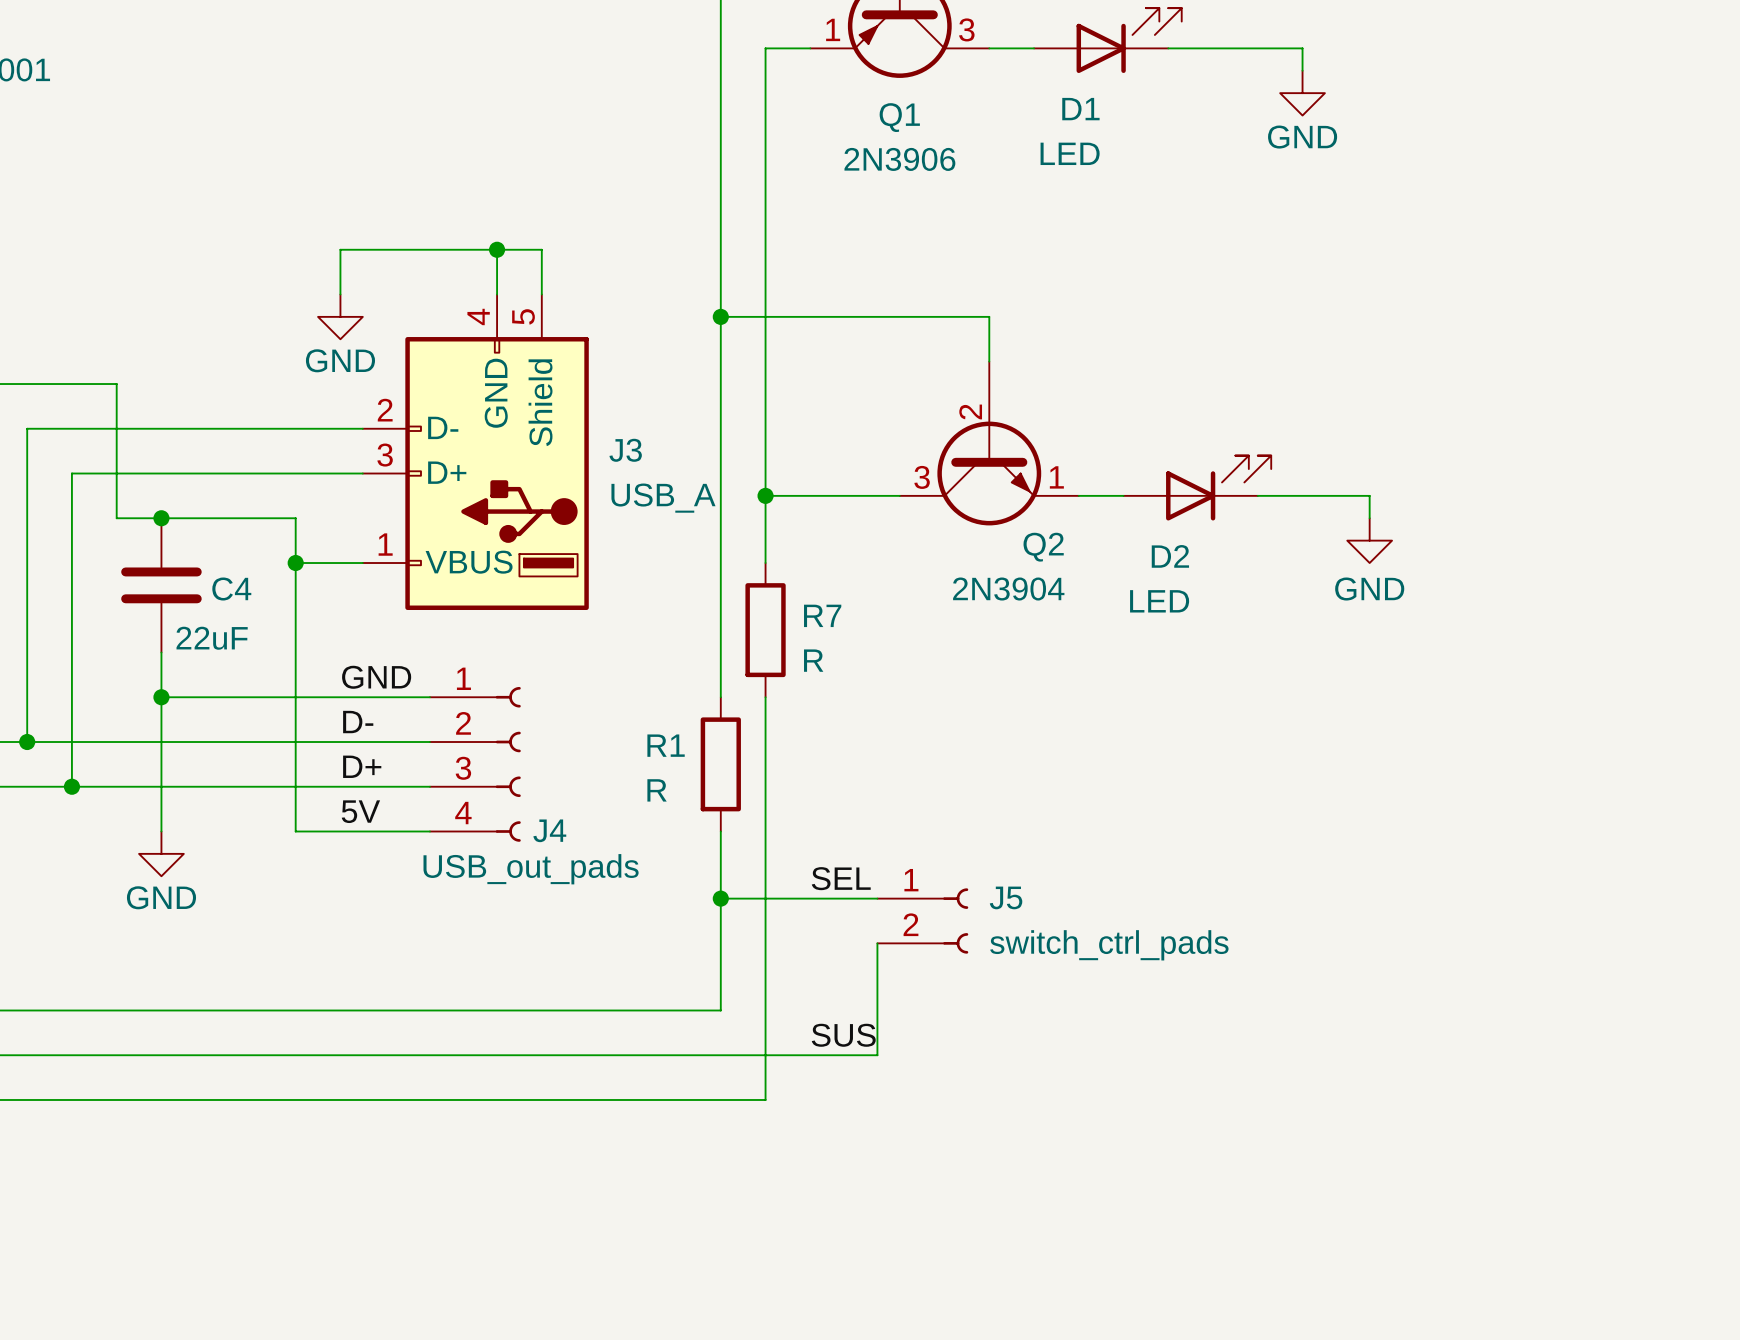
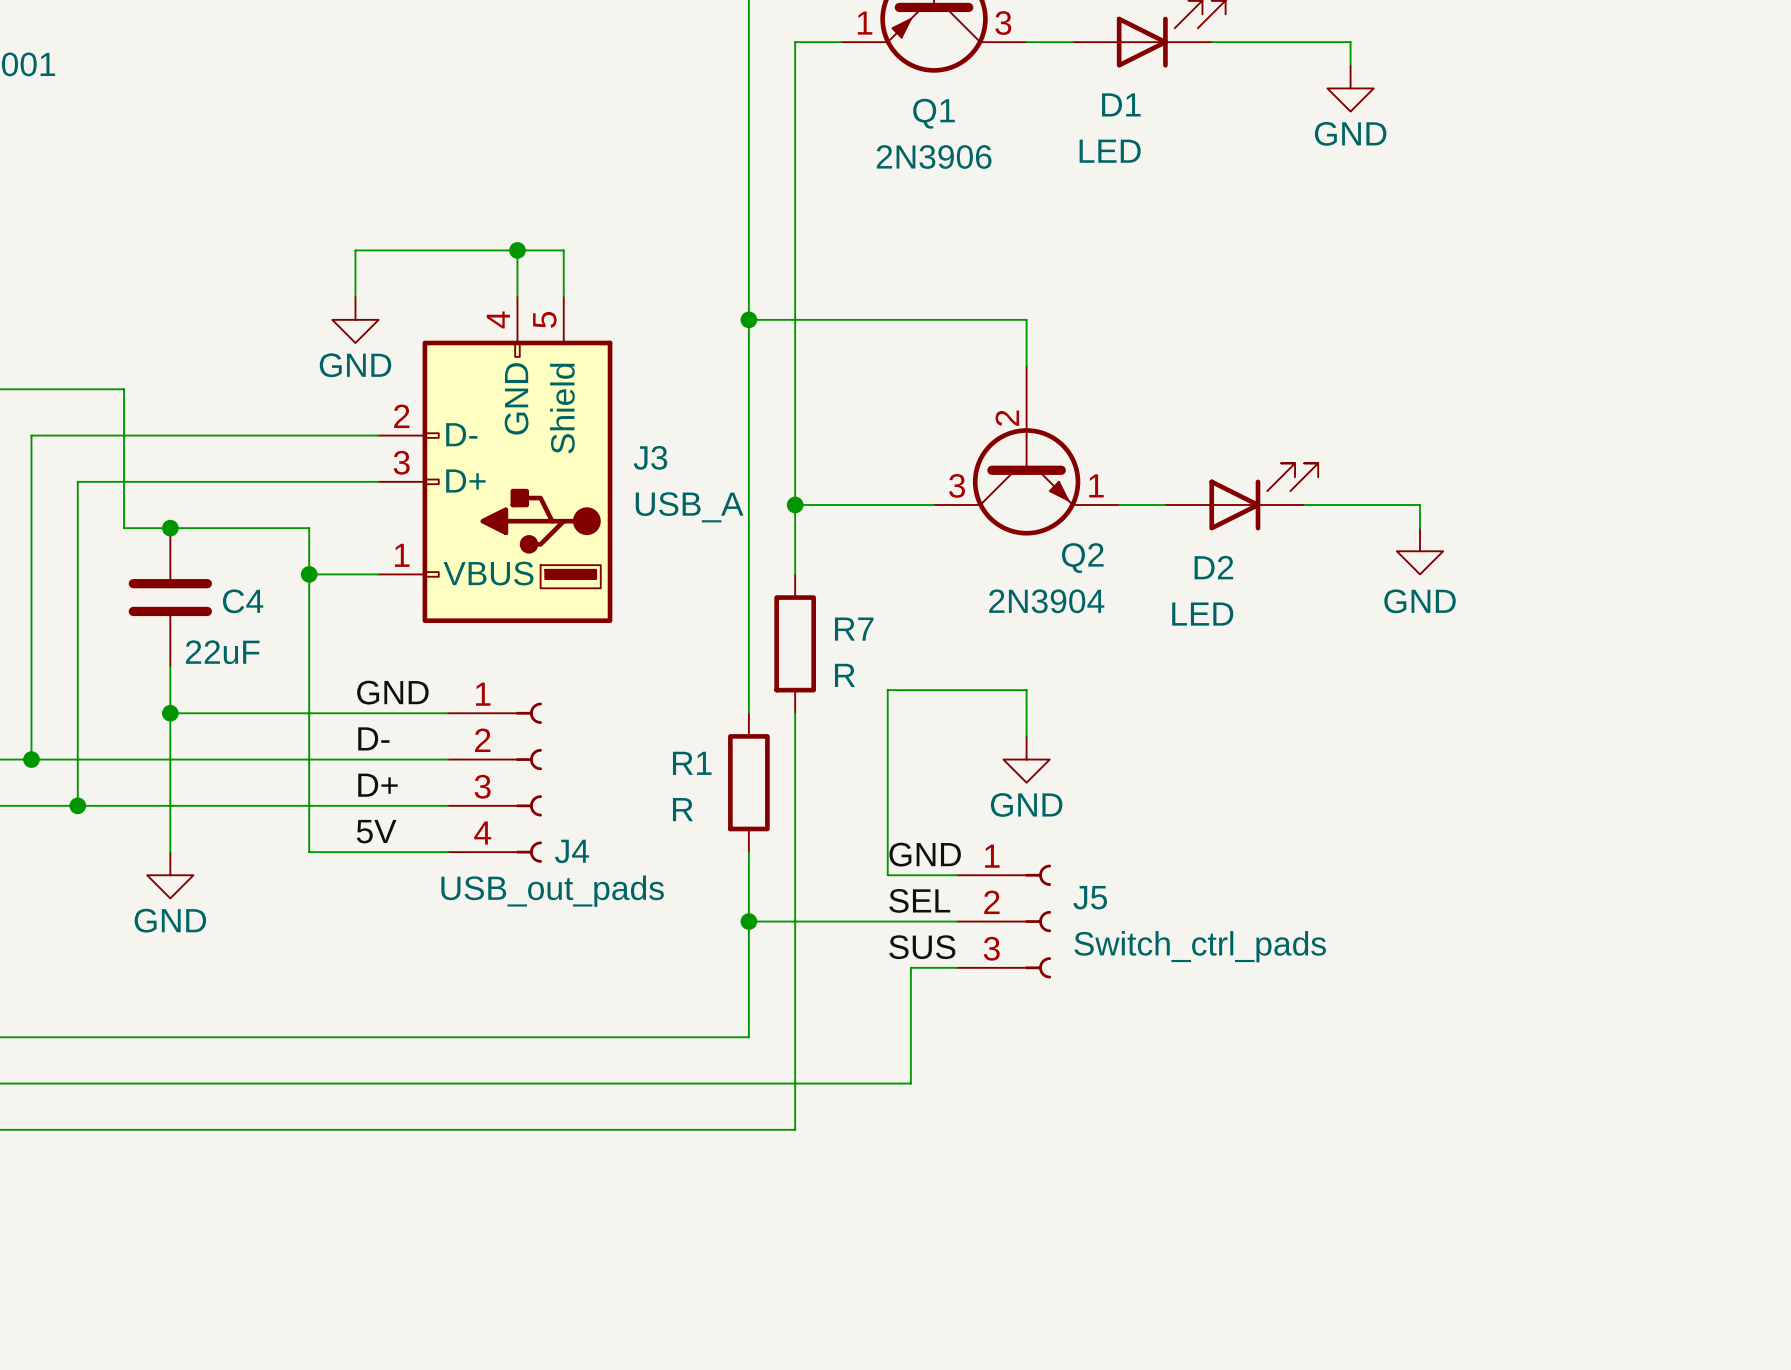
wire: none -> (1026, 736) (1026, 690) (887, 690) (887, 875) (957, 875)
power symbol: none -> GND (1026, 759)
label: none -> GND (925, 854)
label position: SEL (841, 878) -> SEL (919, 900)
J5 symbol: [877, 888, 969, 954] -> [957, 864, 1052, 979]
J5 value: switch_ctrl_pads (1109, 945) -> Switch_ctrl_pads (1200, 946)
label position: SUS (843, 1035) -> SUS (922, 947)

